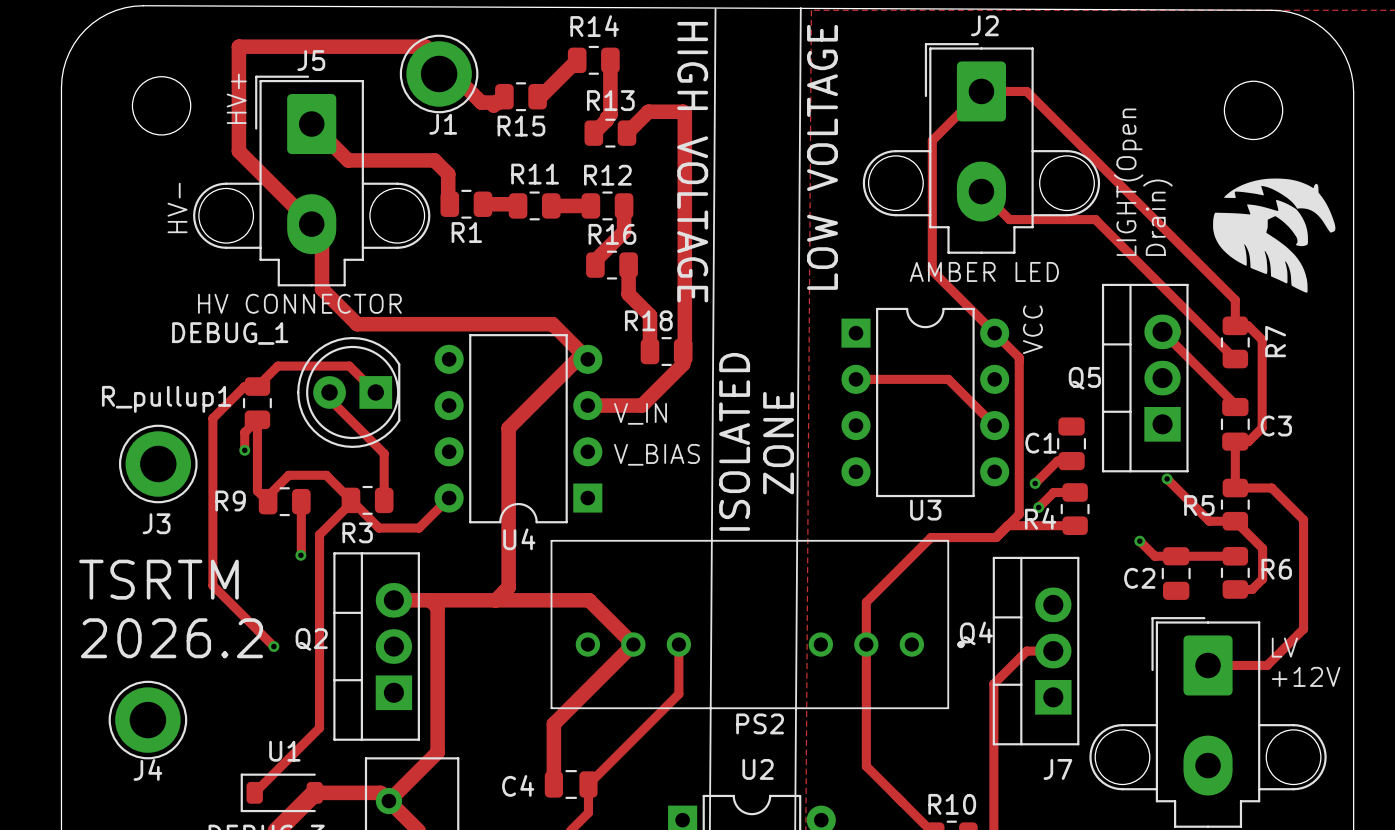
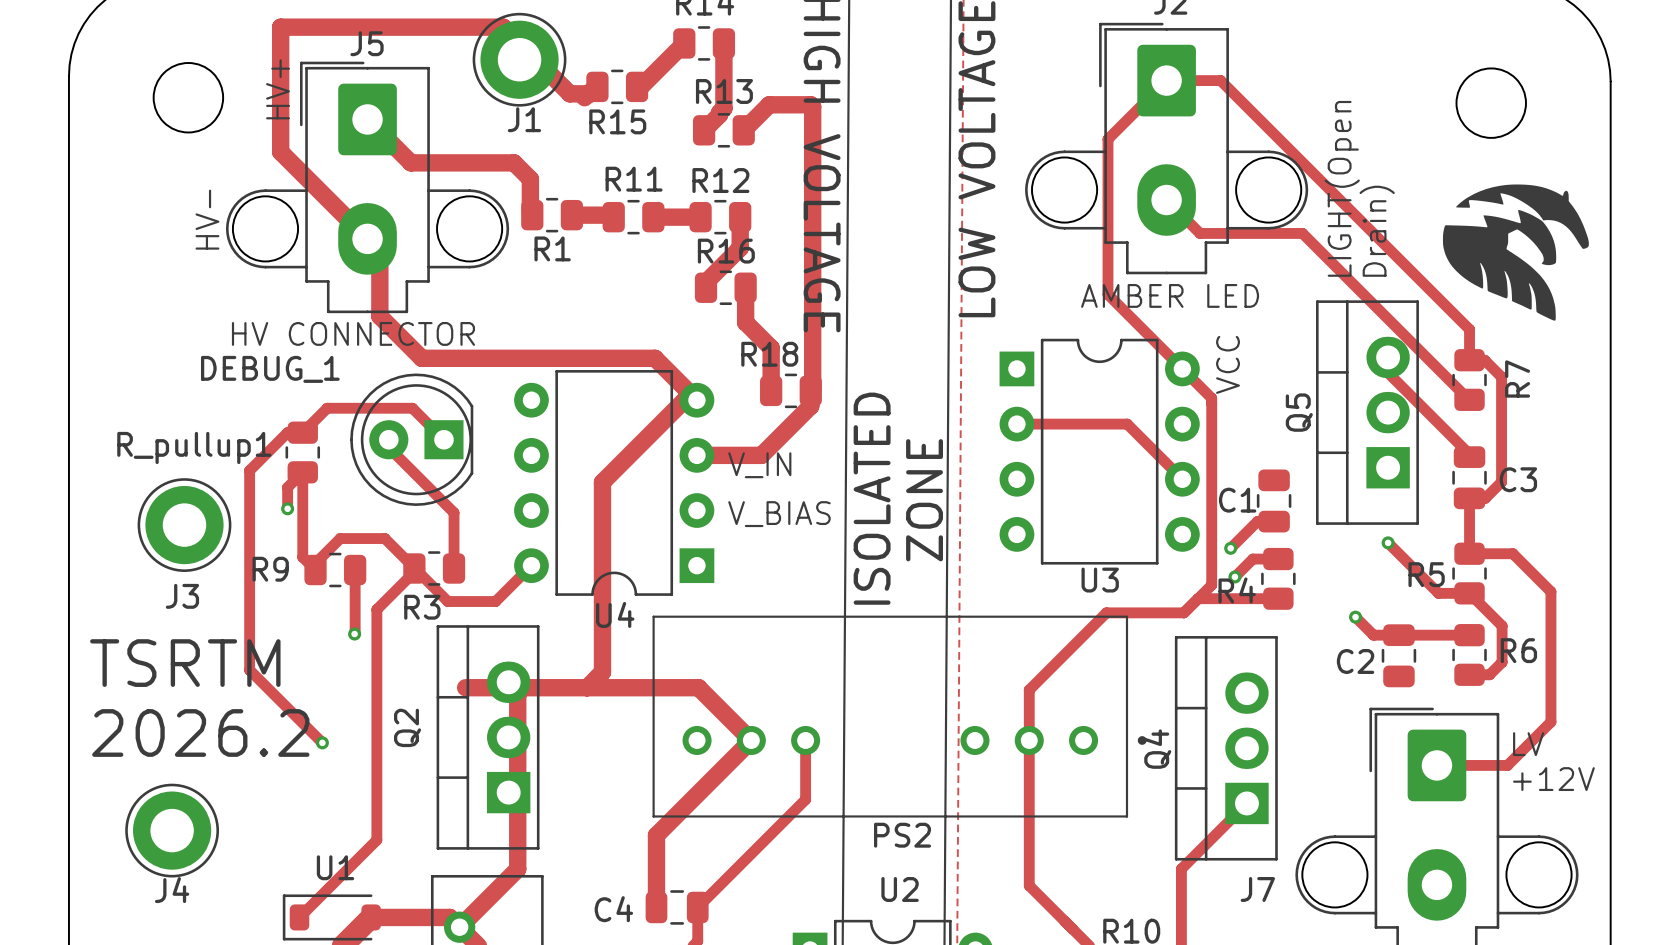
Q5 footprint: [1101, 283, 1189, 473] -> [1316, 300, 1419, 525]
Q5 name rotation: 0° (1084, 378) -> 90° counterclockwise (1299, 412)
Q2 footprint: [333, 552, 420, 741] -> [436, 625, 540, 850]
Q4 footprint: [992, 556, 1080, 746] -> [1174, 636, 1278, 861]
Q4 name rotation: 0° (976, 633) -> 90° counterclockwise (1157, 749)
track: (1053, 651) (1026, 651) (993, 683) (993, 752) -> (1246, 803) (1181, 868)

